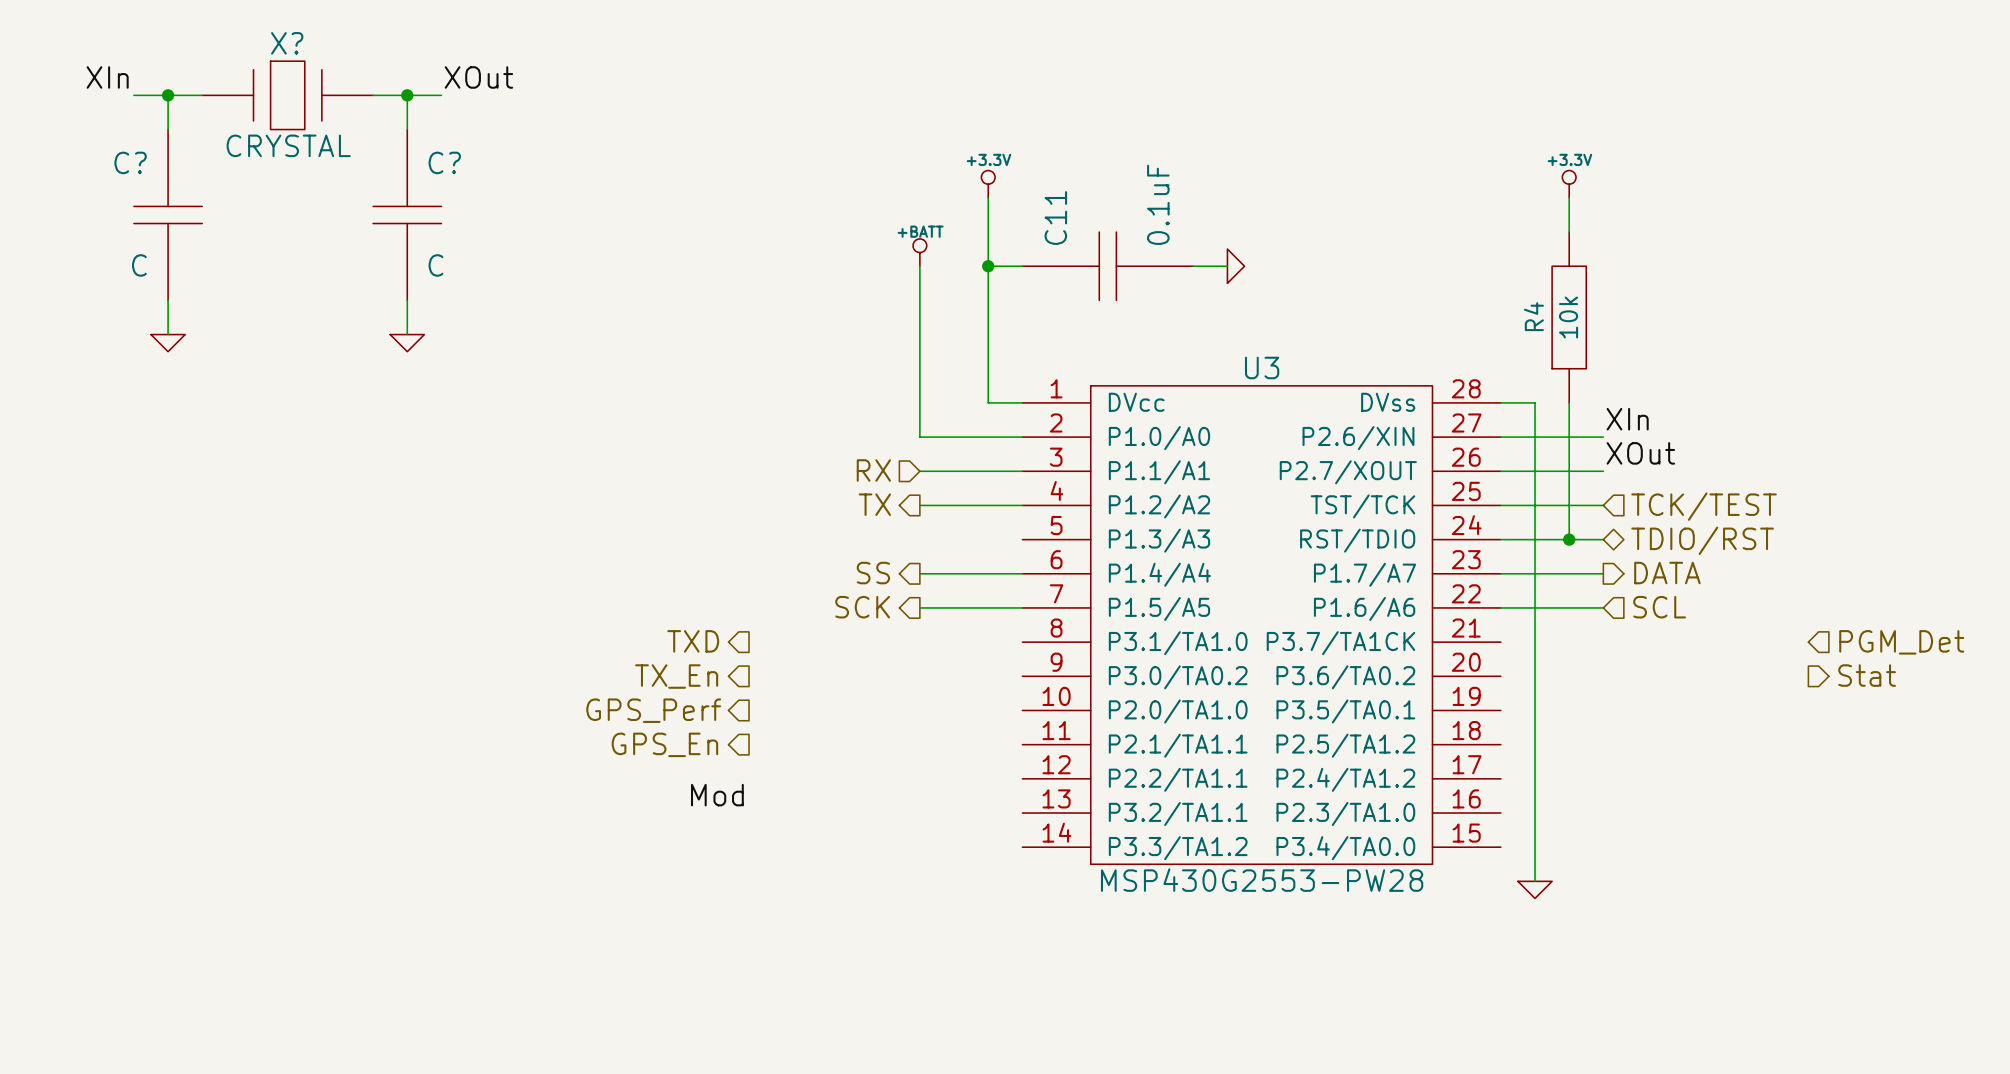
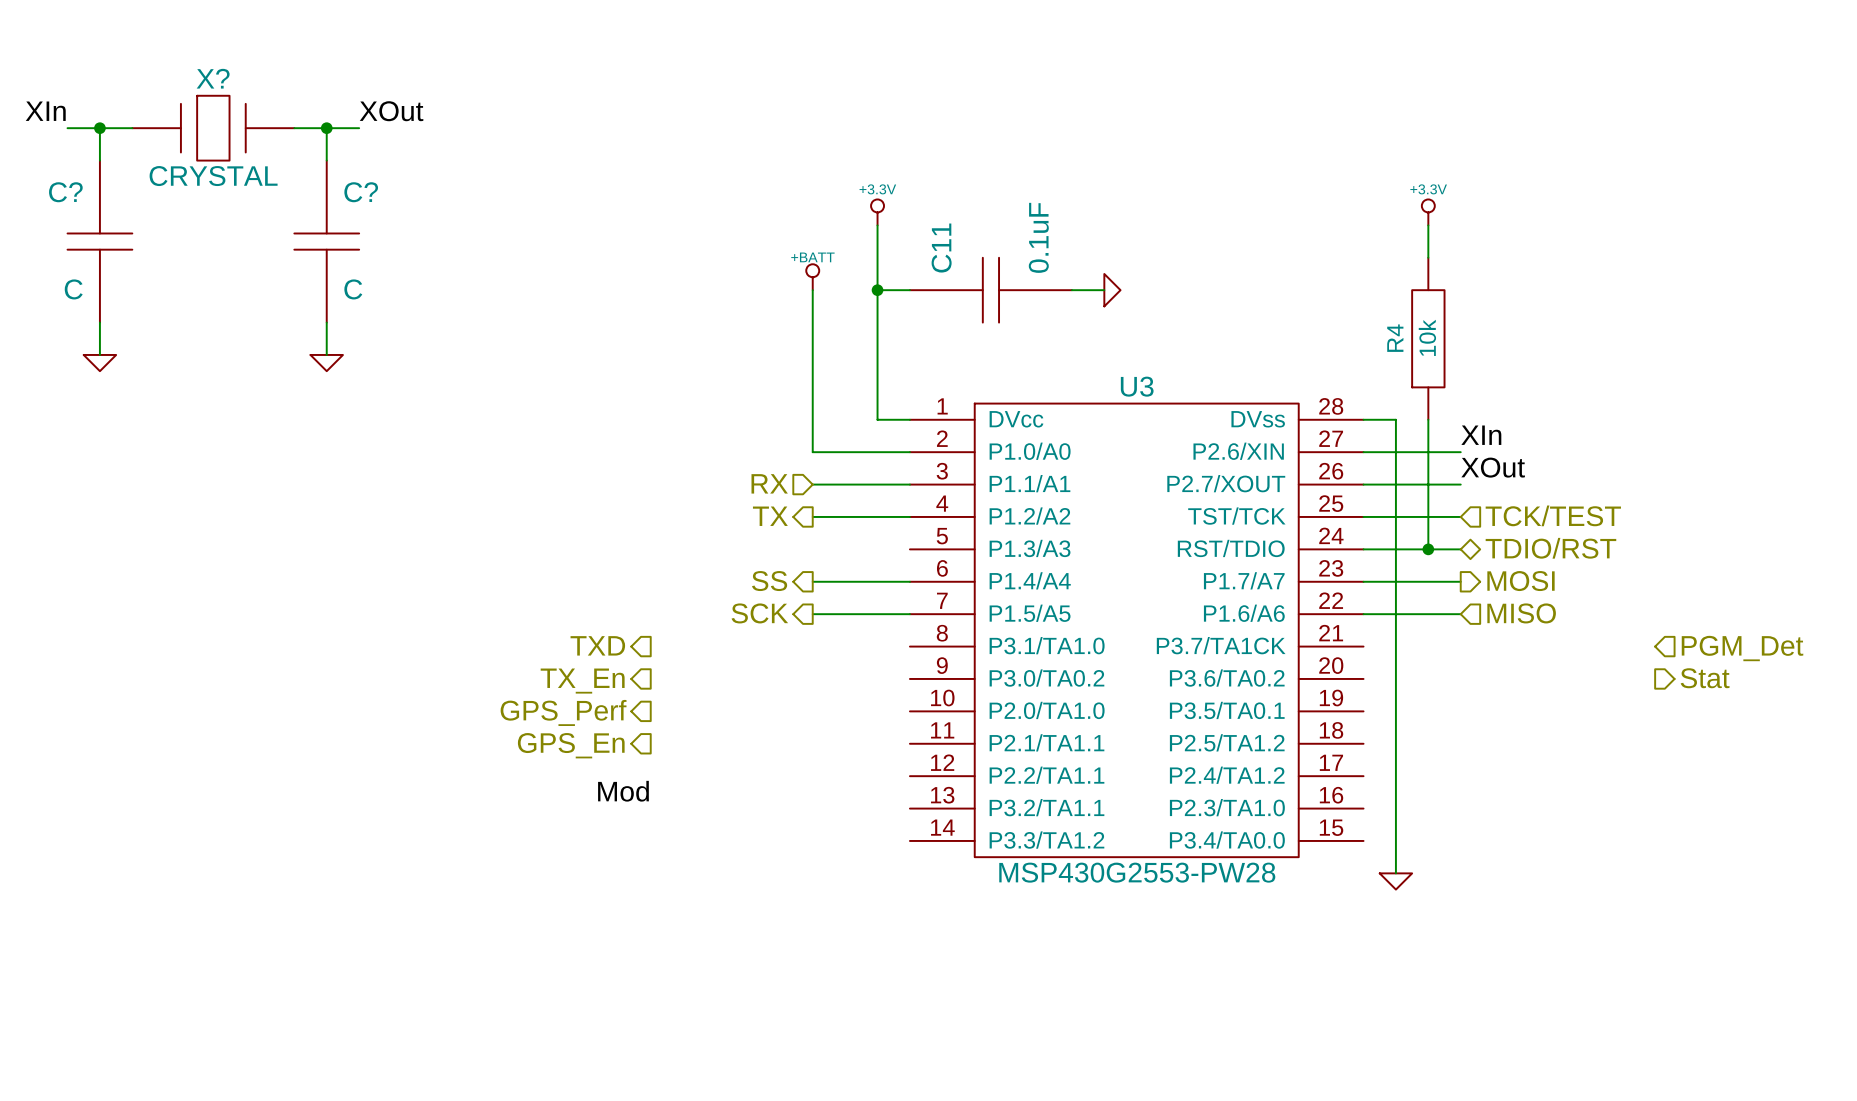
hierarchical label: DATA (1667, 573) -> MOSI (1520, 581)
hierarchical label: SCL (1659, 607) -> MISO (1521, 613)

